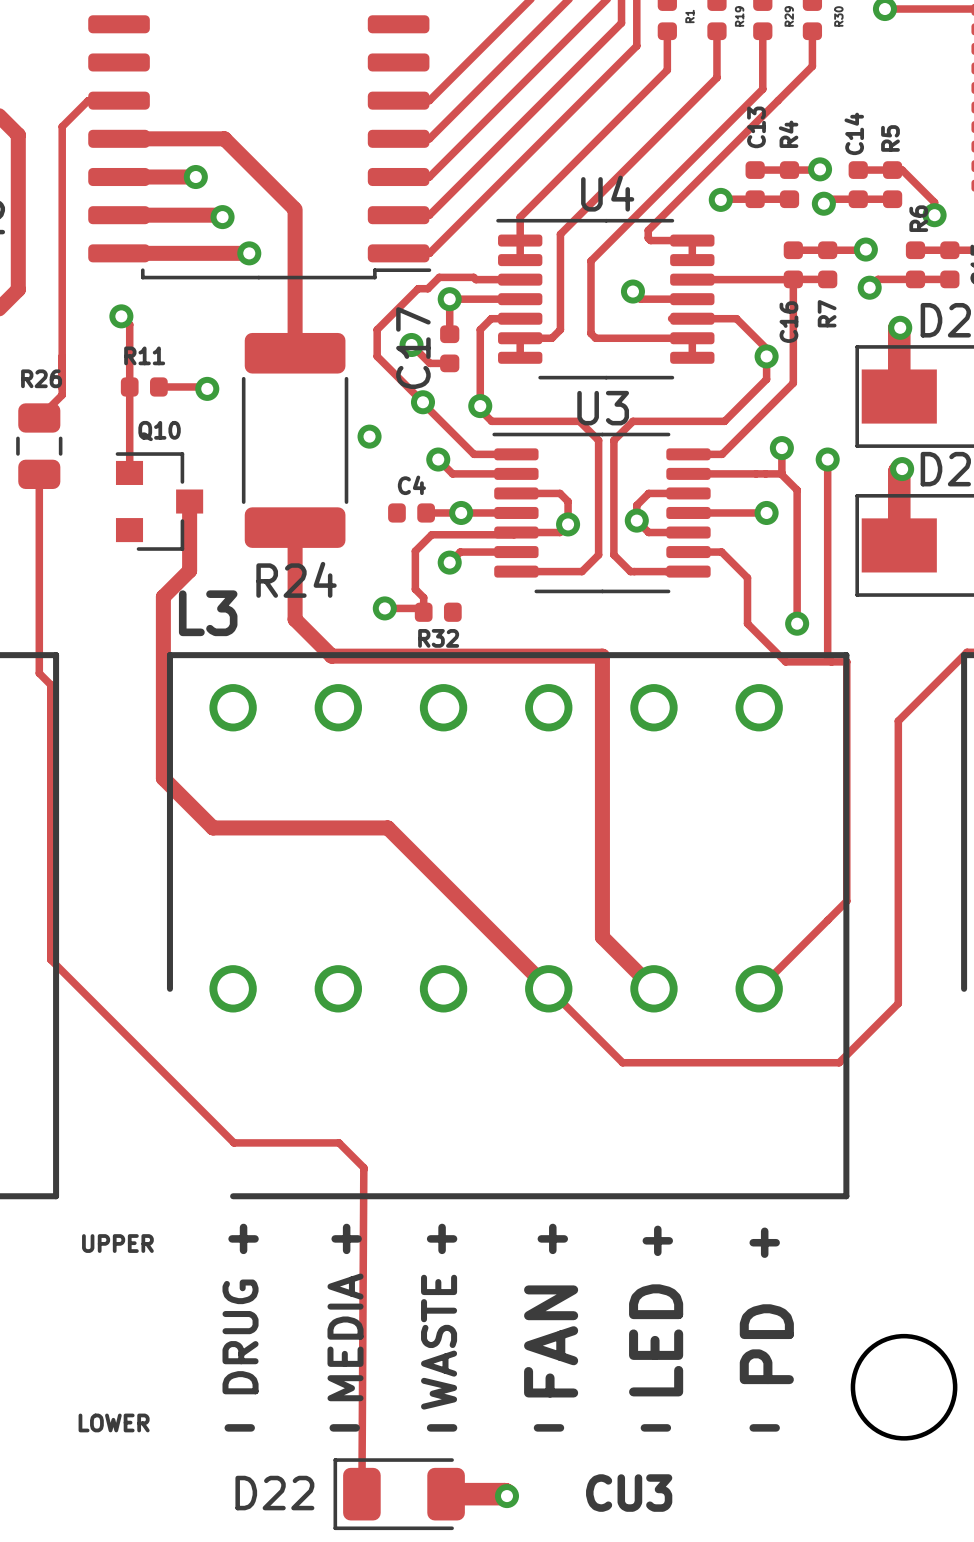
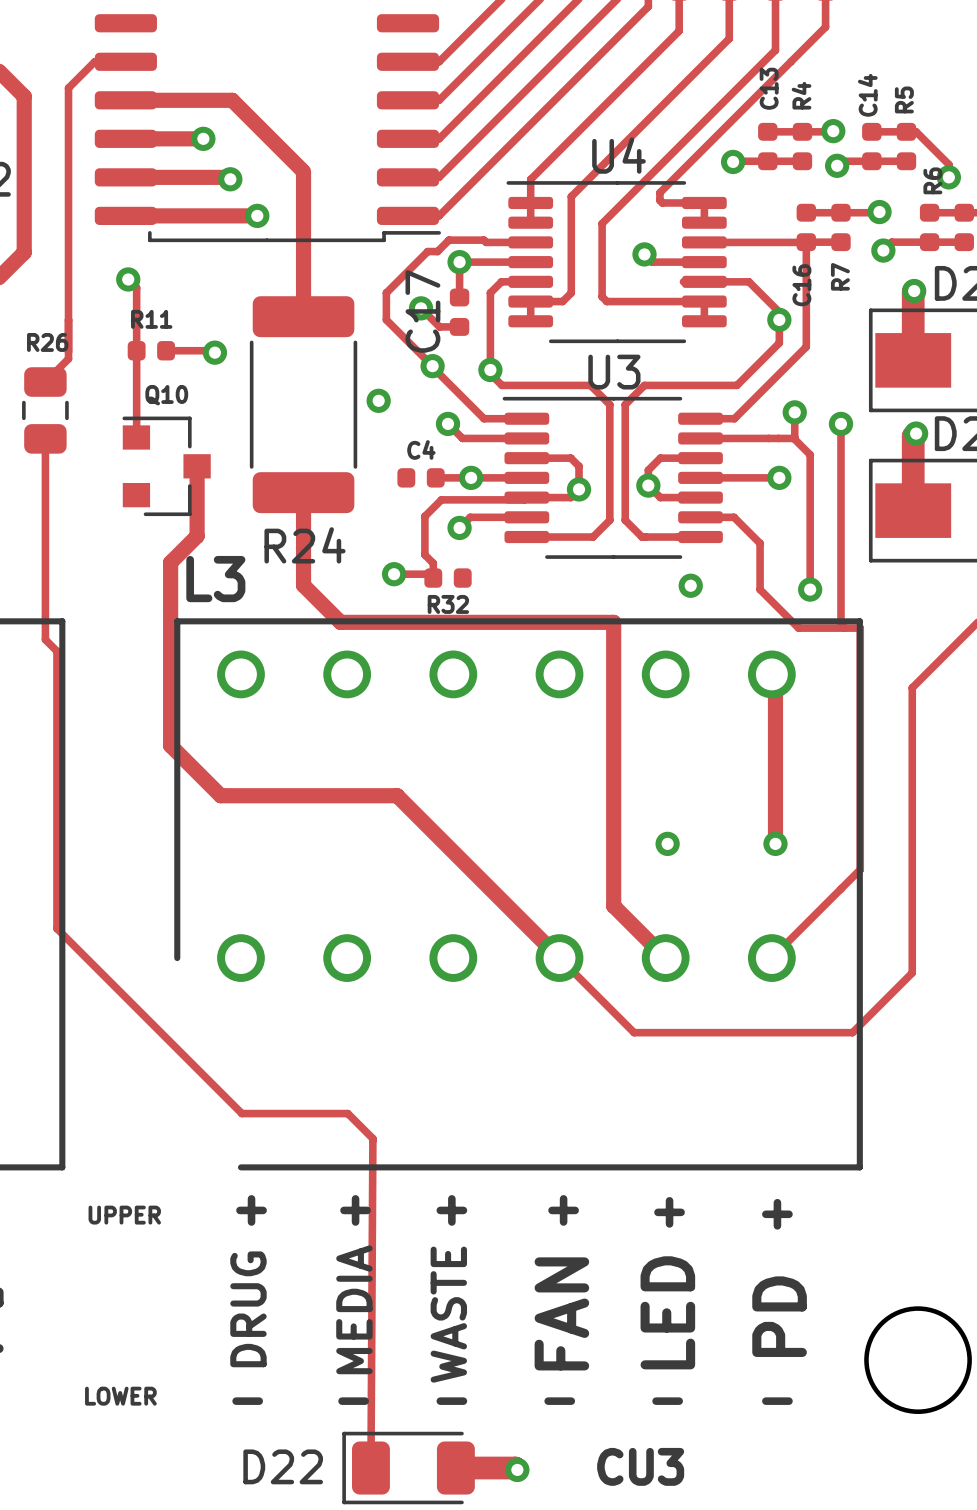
via: none -> (690, 585)
track: none -> (771, 674) (775, 678) (775, 843)
via: none -> (667, 843)
via: none -> (775, 843)

